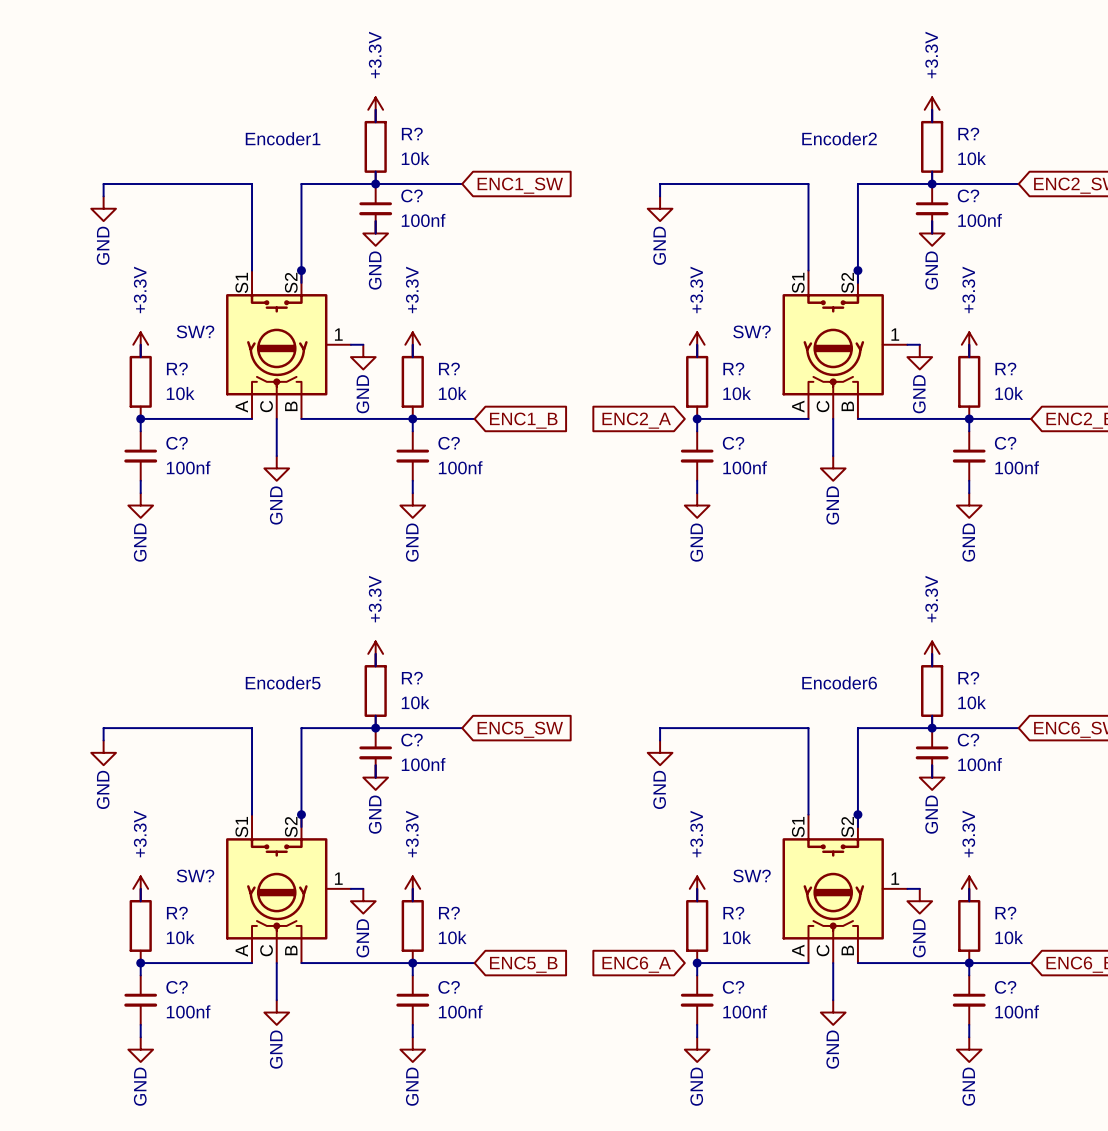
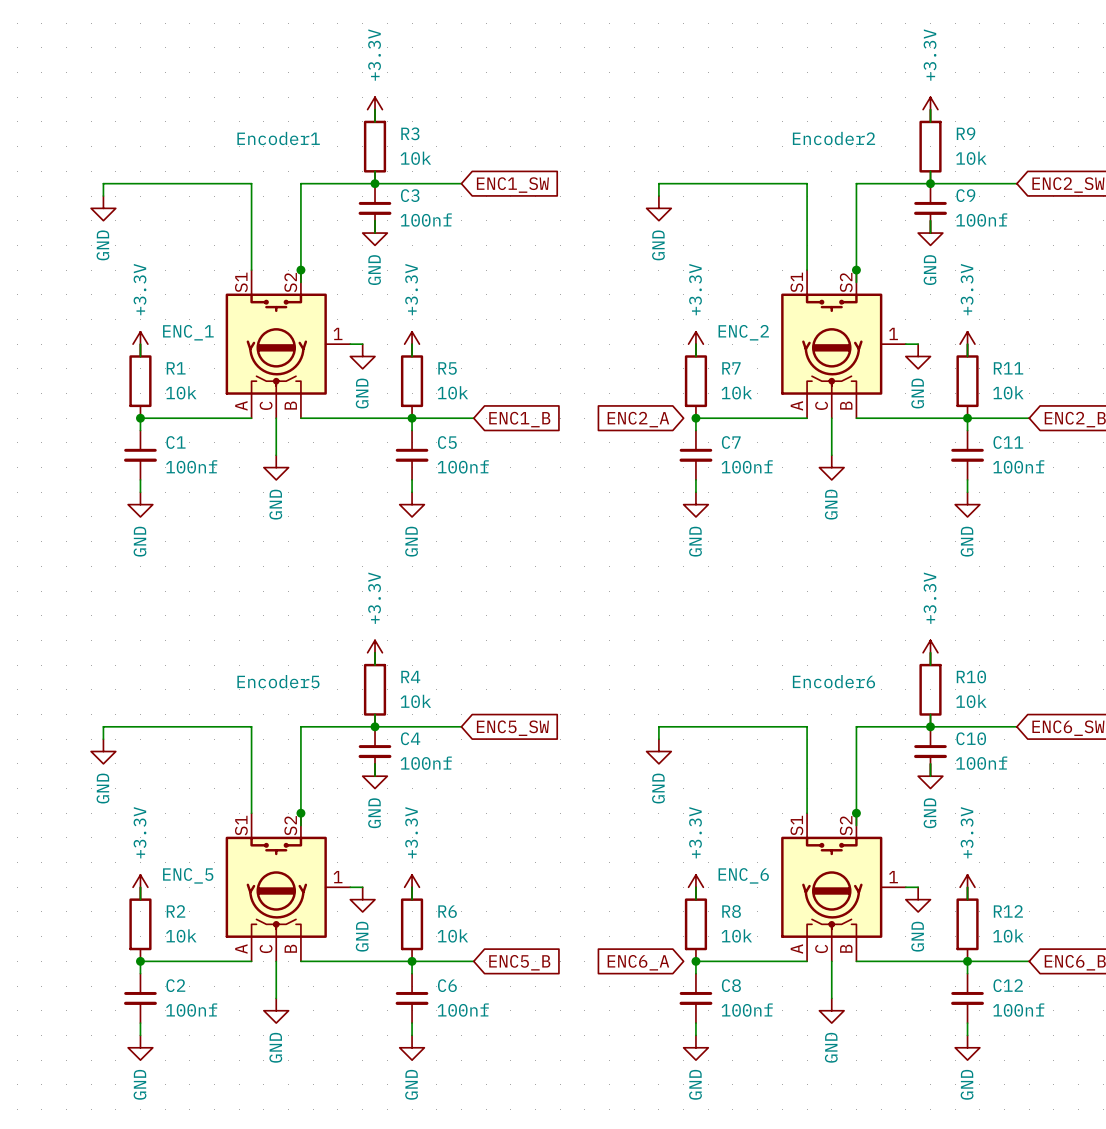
R? name: R? (412, 133) -> R3 (410, 133)
R? name: R? (968, 133) -> R9 (966, 133)
C? name: C? (412, 195) -> C3 (410, 195)
C? name: C? (968, 195) -> C9 (965, 195)
SW? name: SW? (195, 331) -> ENC_1 (188, 332)
SW? name: SW? (751, 331) -> ENC_2 (743, 332)
R? name: R? (177, 368) -> R1 (176, 368)
R? name: R? (449, 368) -> R5 (447, 368)
R? name: R? (733, 368) -> R7 (731, 368)
R? name: R? (1005, 368) -> R11 (1008, 368)
C? name: C? (177, 443) -> C1 (175, 442)
C? name: C? (449, 443) -> C5 (447, 442)
C? name: C? (733, 443) -> C7 (731, 442)
C? name: C? (1005, 443) -> C11 (1008, 442)
R? name: R? (412, 678) -> R4 (410, 676)
R? name: R? (968, 678) -> R10 (971, 676)
C? name: C? (412, 740) -> C4 (410, 738)
C? name: C? (968, 740) -> C10 (971, 738)
SW? name: SW? (195, 876) -> ENC_5 (188, 875)
SW? name: SW? (751, 876) -> ENC_6 (743, 875)
R? name: R? (177, 913) -> R2 (176, 911)
R? name: R? (449, 913) -> R6 (447, 911)
R? name: R? (733, 913) -> R8 (731, 911)
R? name: R? (1005, 913) -> R12 (1008, 911)
C? name: C? (177, 987) -> C2 (175, 985)
C? name: C? (449, 987) -> C6 (447, 985)
C? name: C? (733, 987) -> C8 (731, 985)
C? name: C? (1005, 987) -> C12 (1008, 985)

